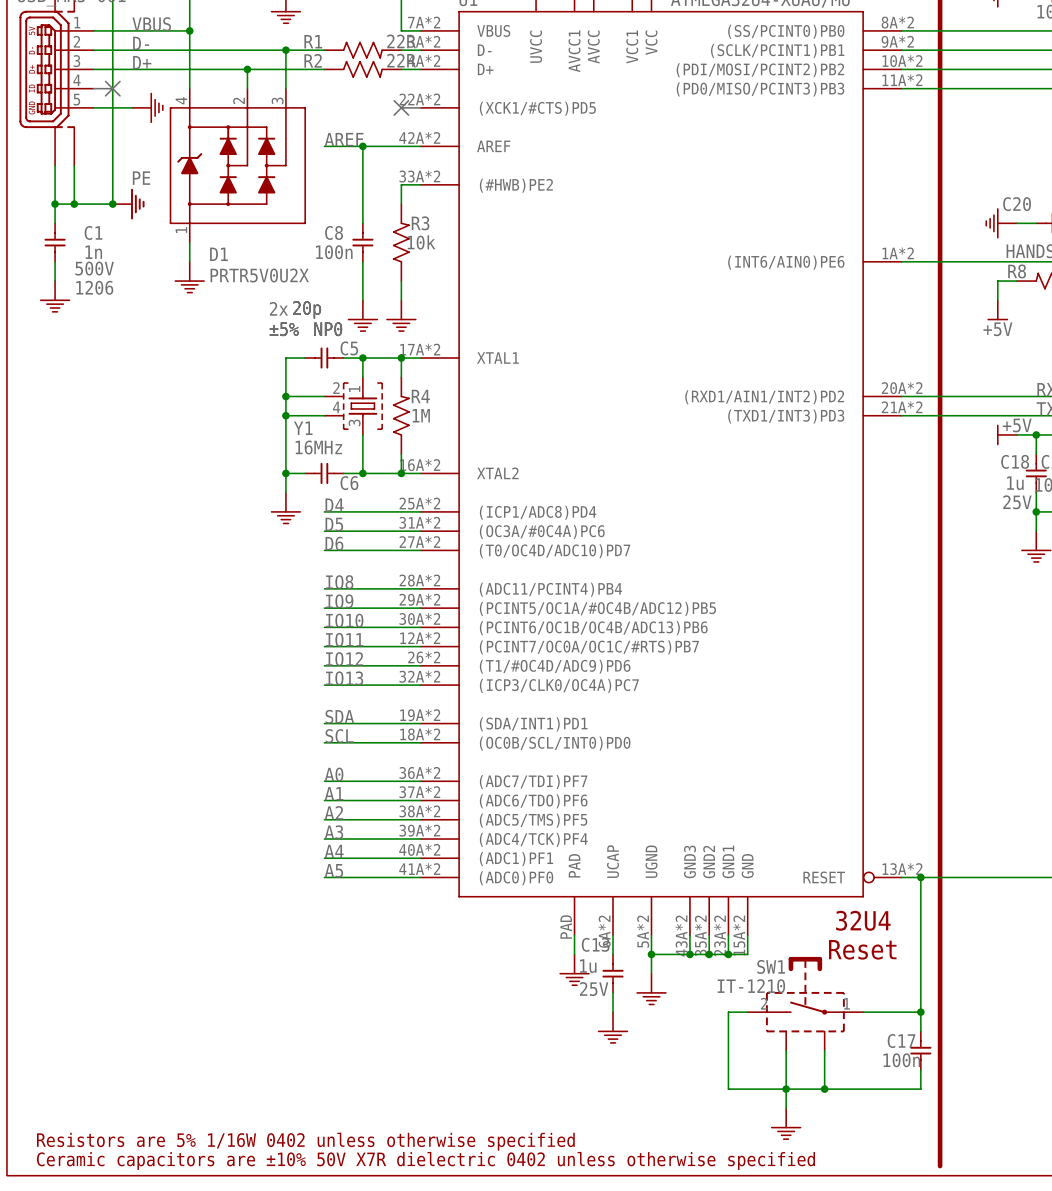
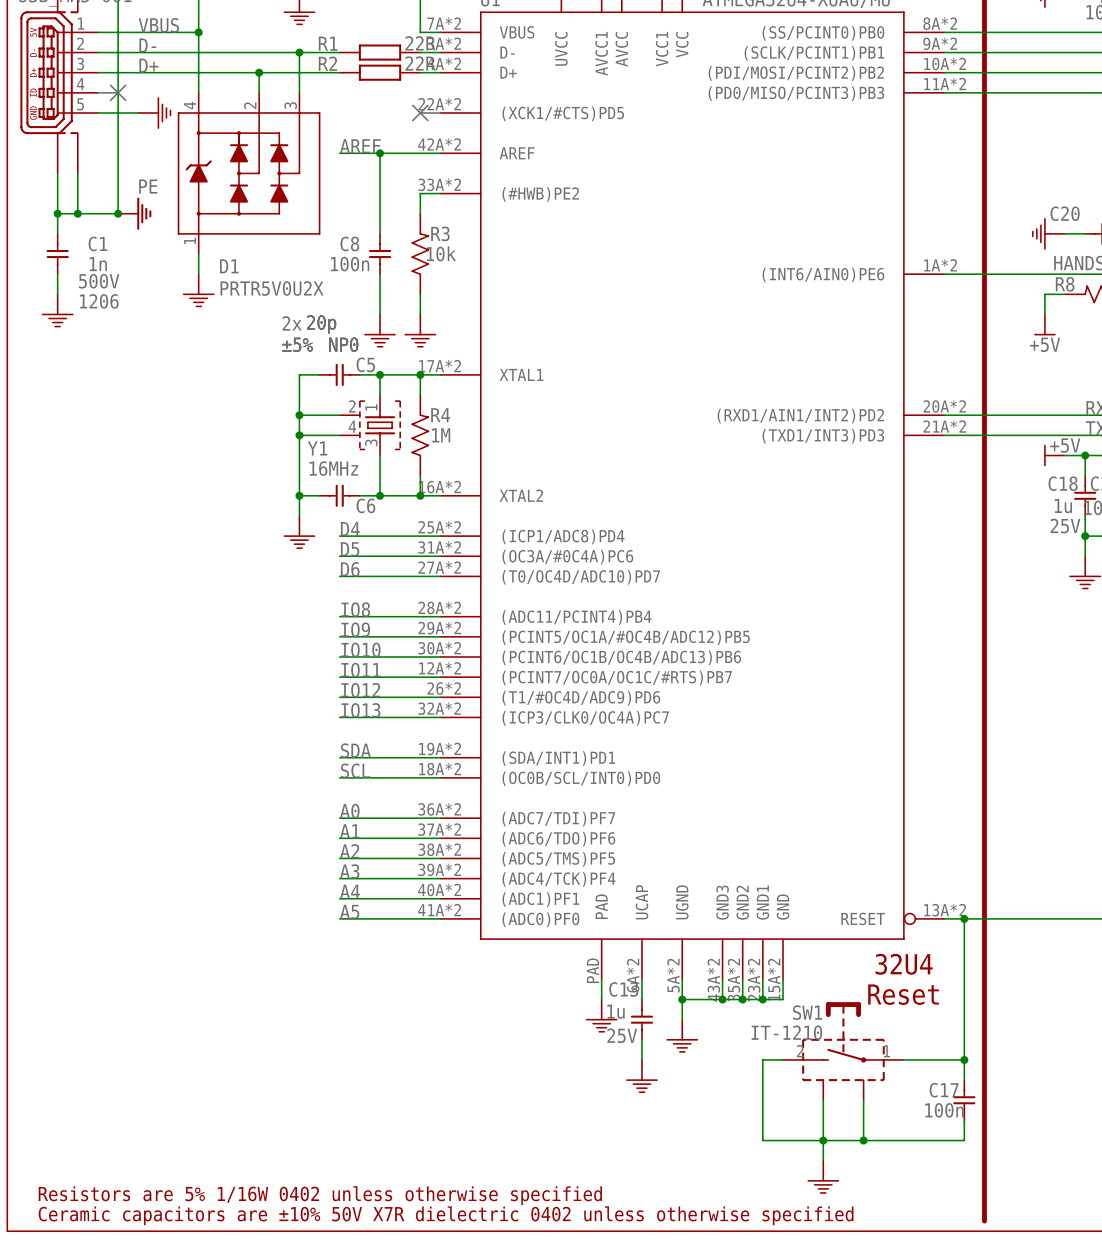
R1 symbol: [324, 41, 402, 59] -> [339, 44, 421, 61]
R2 symbol: [324, 60, 402, 78] -> [339, 64, 421, 81]

